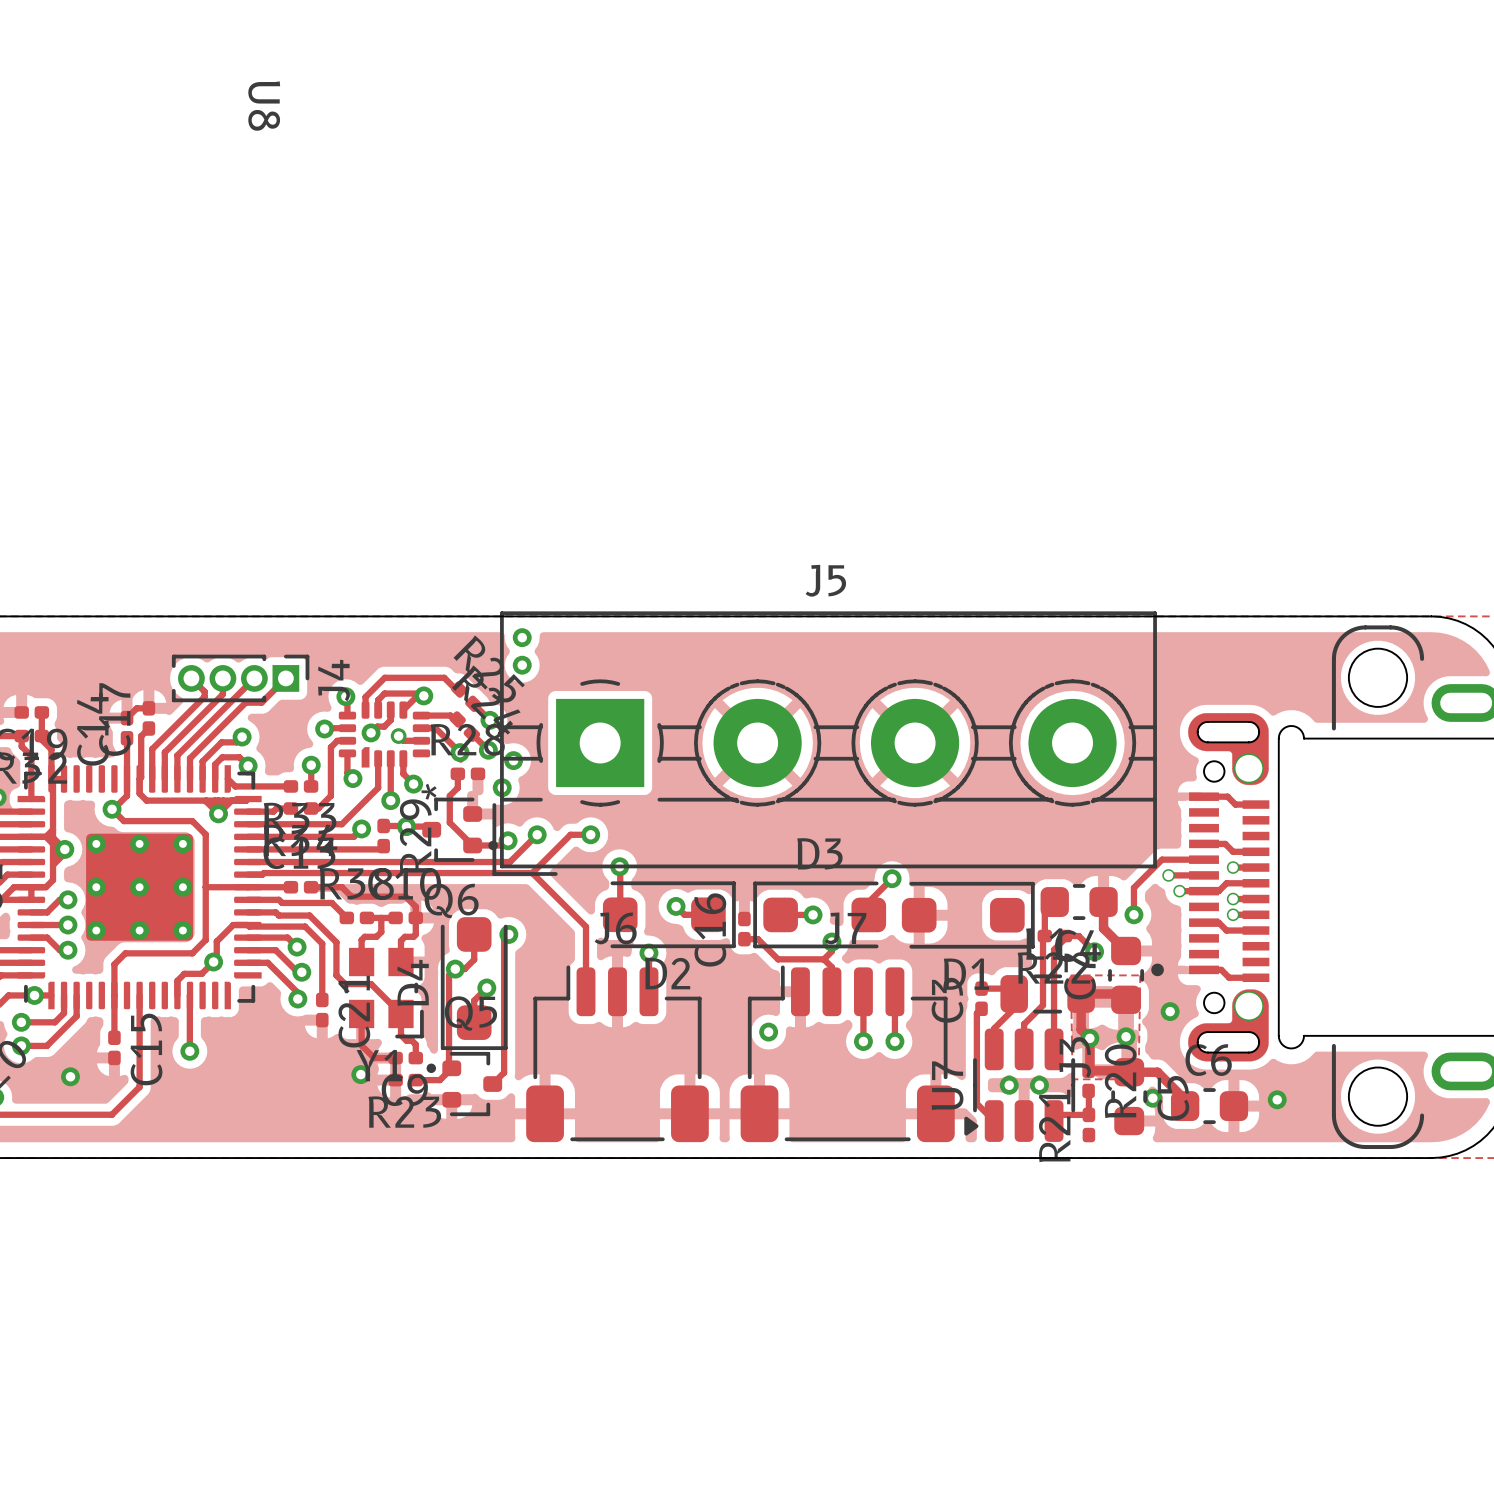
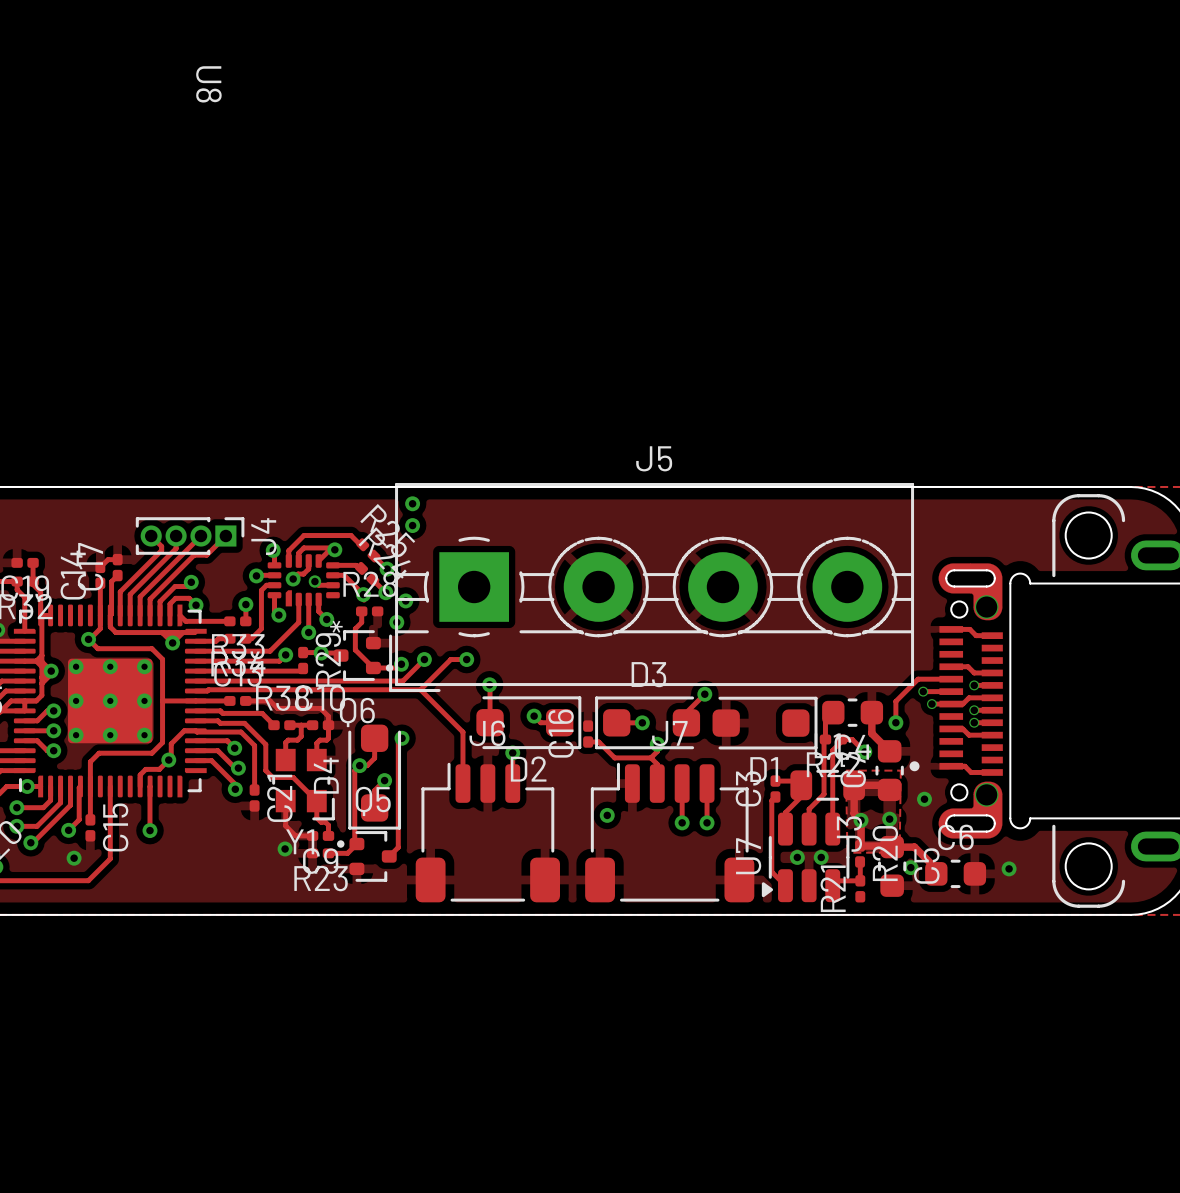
track: none -> (70, 786) (70, 805) (30, 842)
track: none -> (80, 786) (79, 819) (68, 830)
via: none -> (68, 830)
via: none -> (30, 842)
via: (70, 1076) -> none
via: none -> (74, 858)

